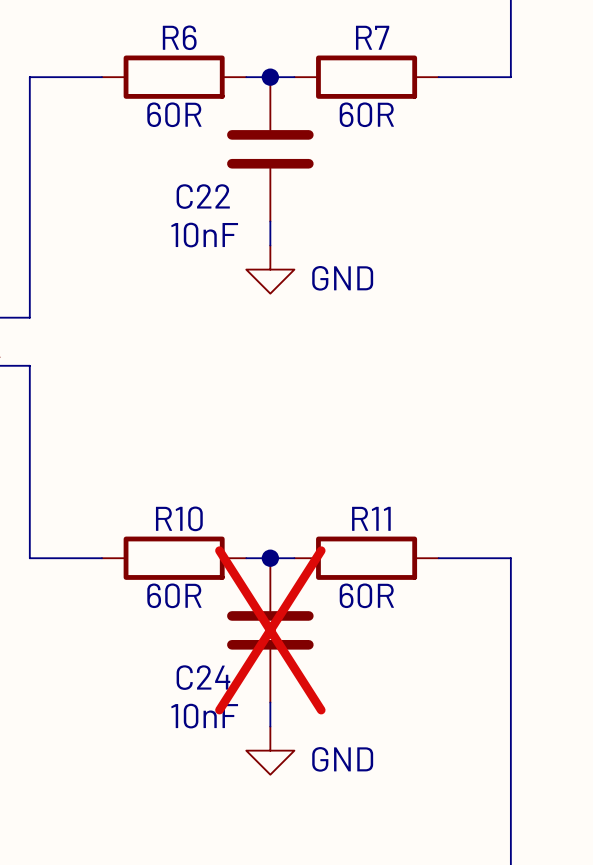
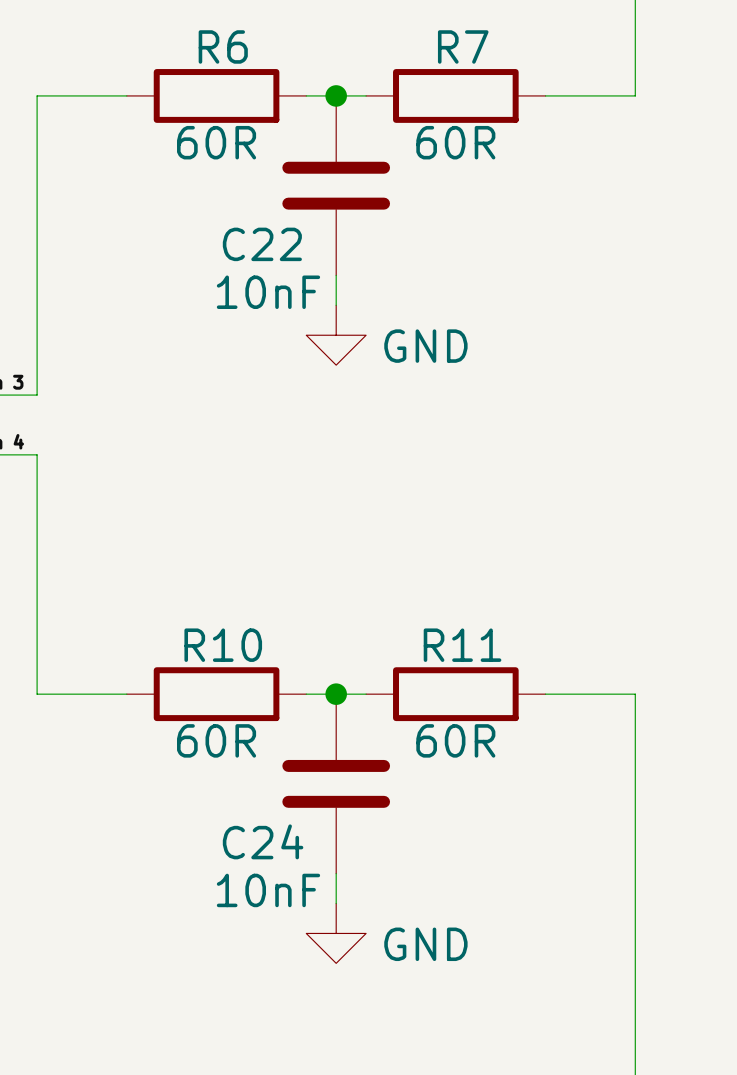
C24 do-not-place cross: (270, 630) -> none

